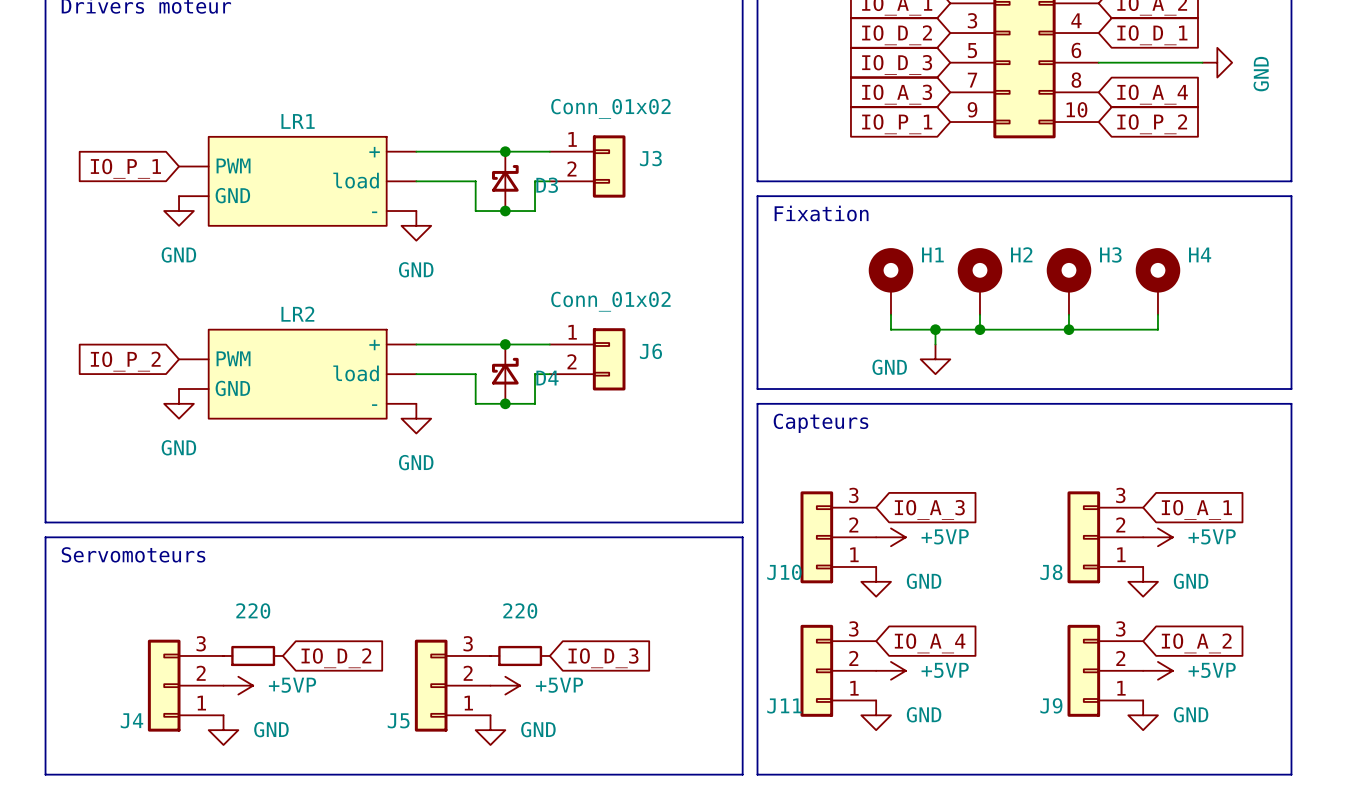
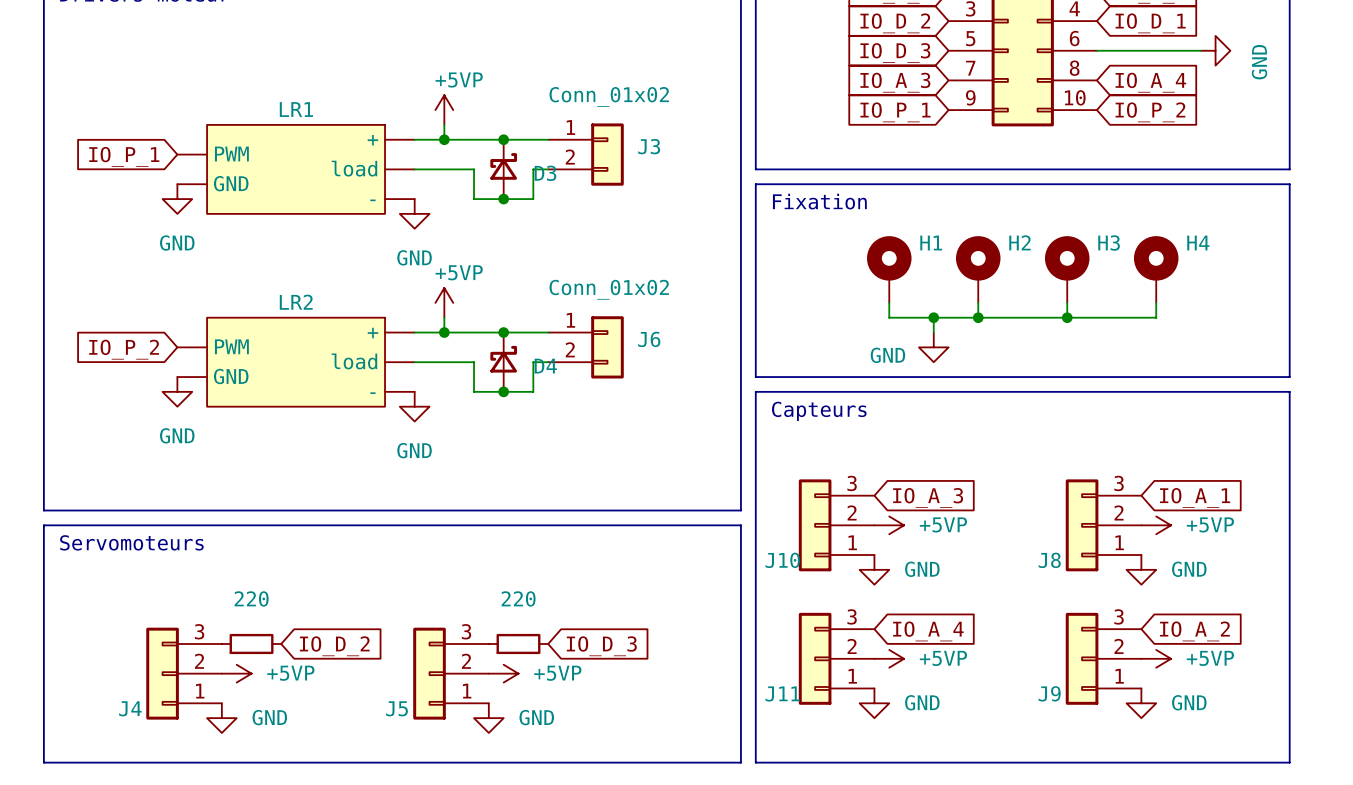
power symbol: none -> +5VP (444, 110)
wire: none -> (444, 124) (444, 139)
junction: none -> (444, 139)
power symbol: none -> +5VP (444, 302)
wire: none -> (444, 317) (444, 332)
junction: none -> (444, 332)

